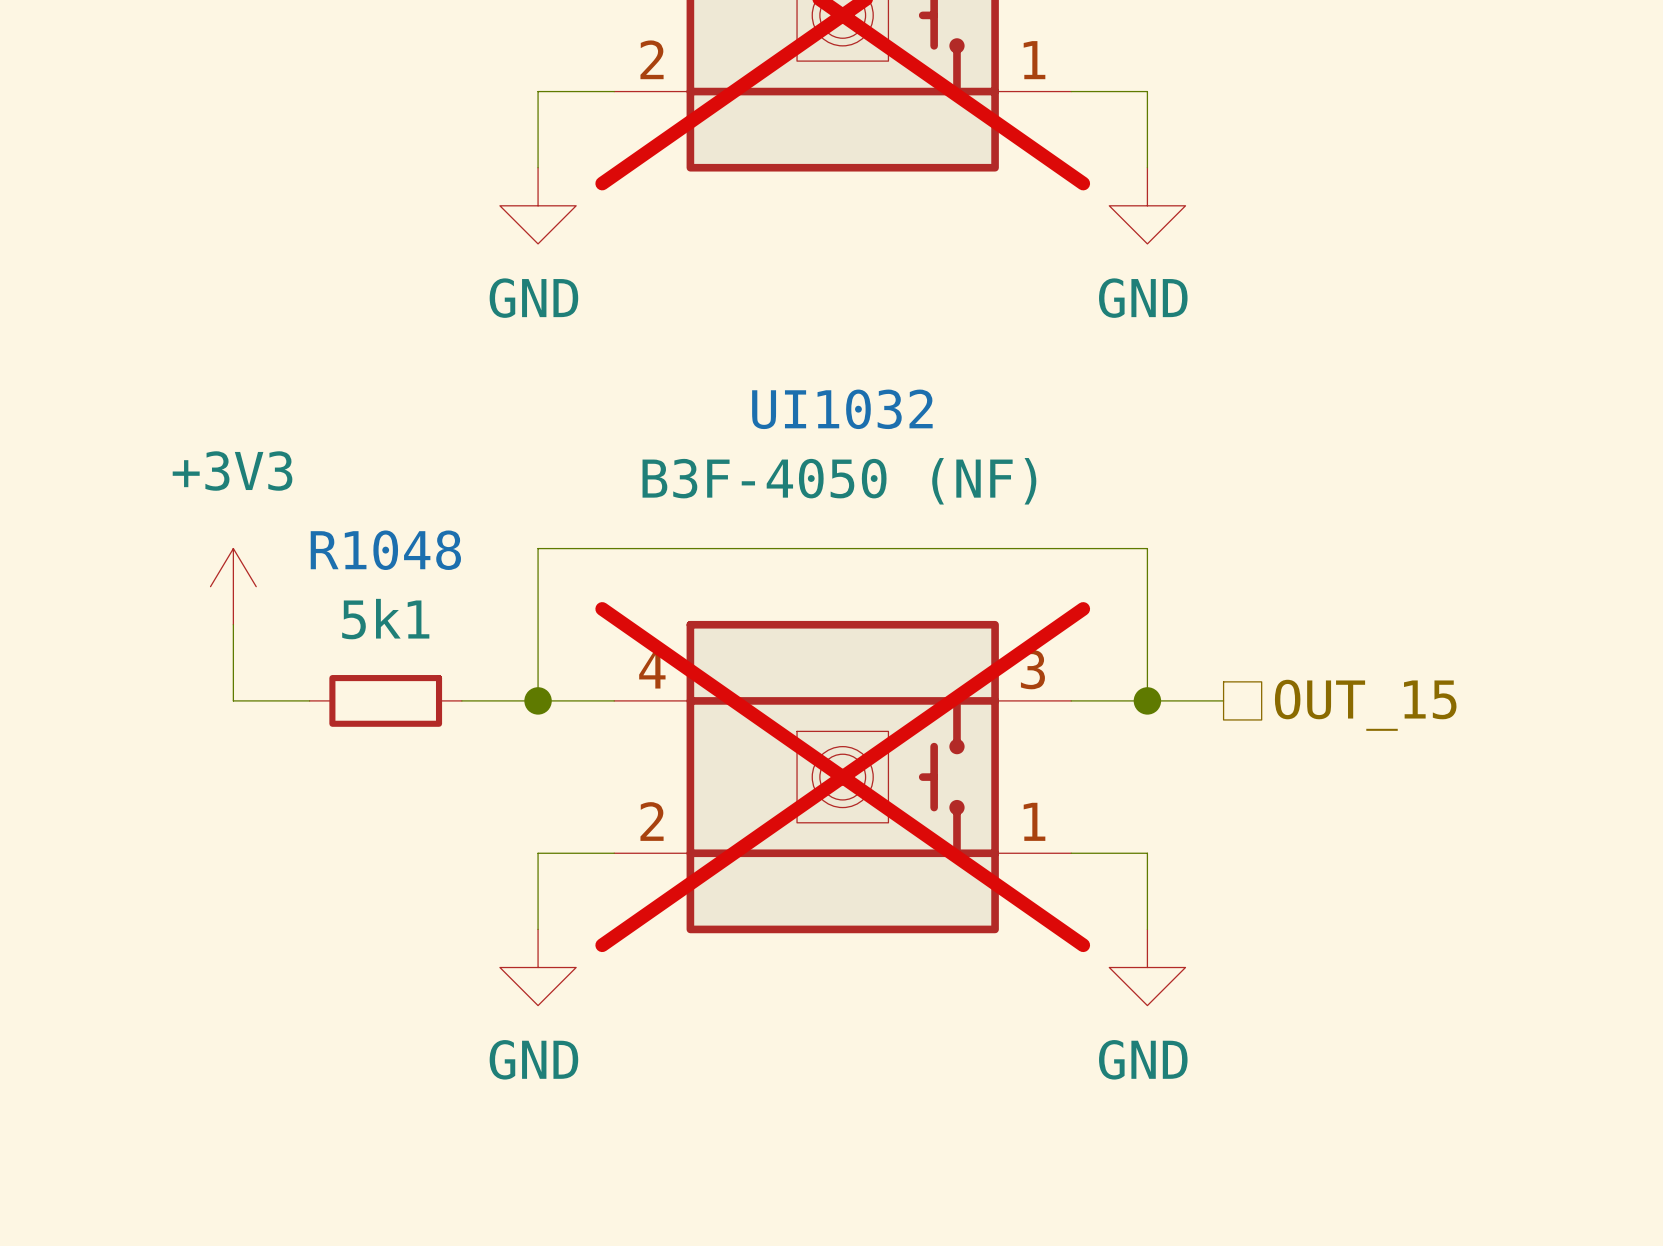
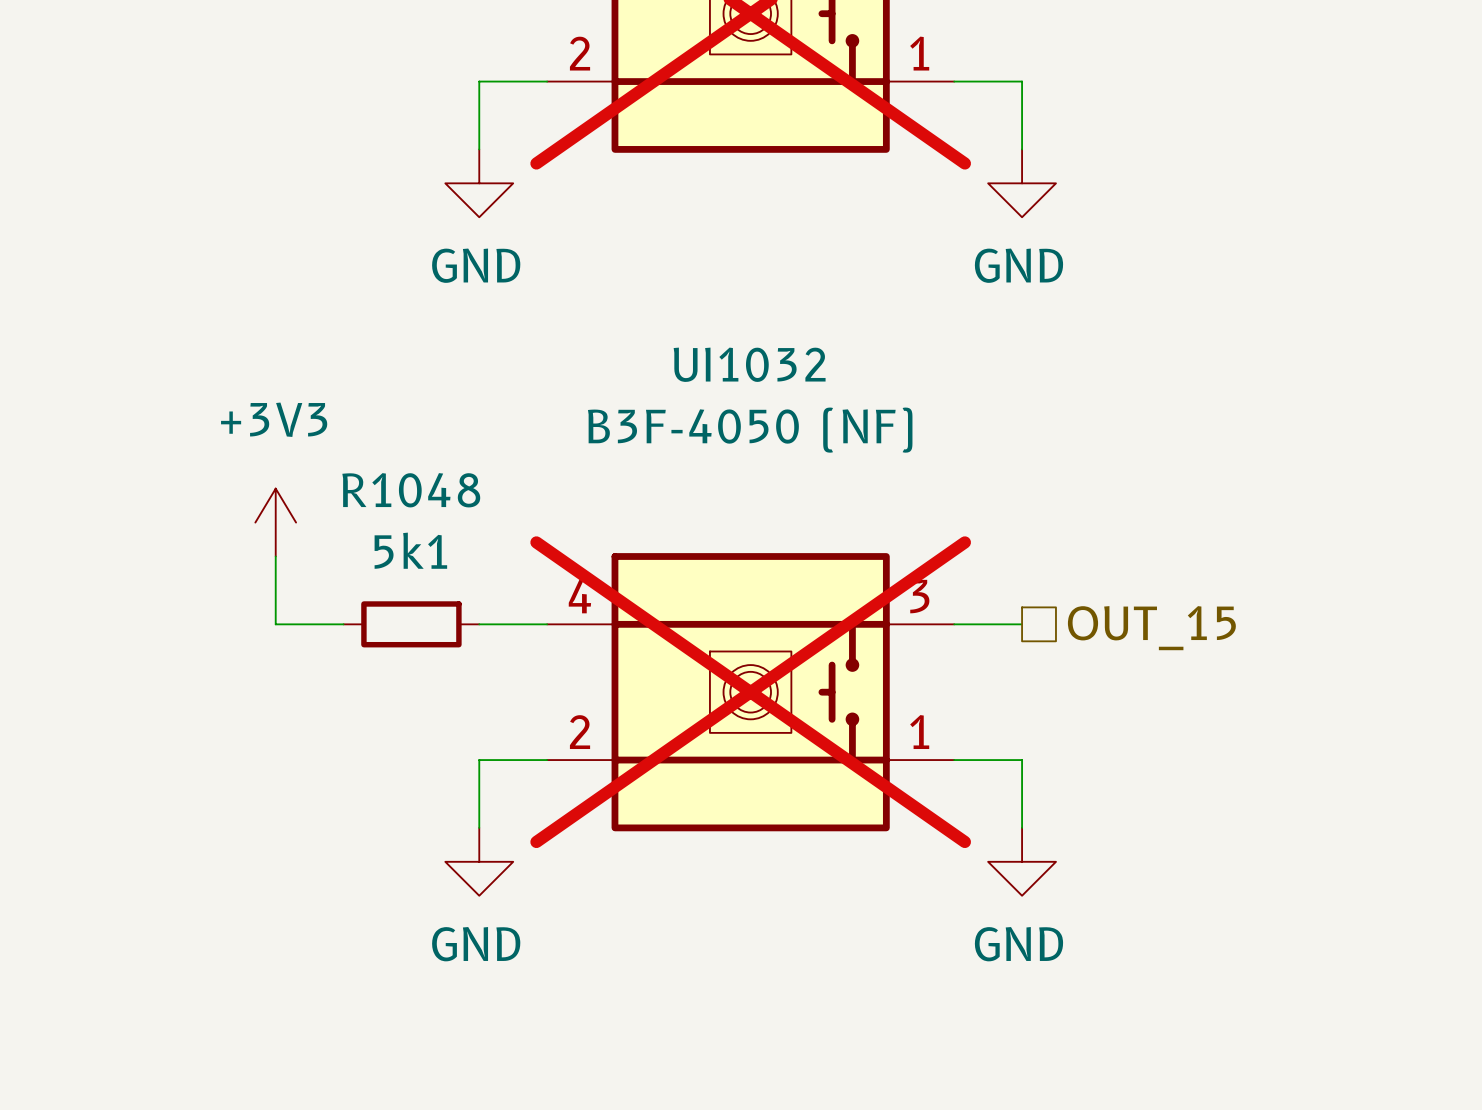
power symbol position: +3V3 (233, 586) -> +3V3 (275, 522)
wire: (233, 624) (233, 700) (309, 700) -> (275, 556) (275, 624) (343, 624)
R1048 position: (385, 700) -> (411, 624)
wire: (461, 700) (538, 700) (538, 548) (1147, 548) (1147, 700) (1223, 700) -> none
junction: (538, 700) -> none
junction: (1147, 700) -> none
hierarchical label position: OUT_15 (1365, 705) -> OUT_15 (1151, 628)

